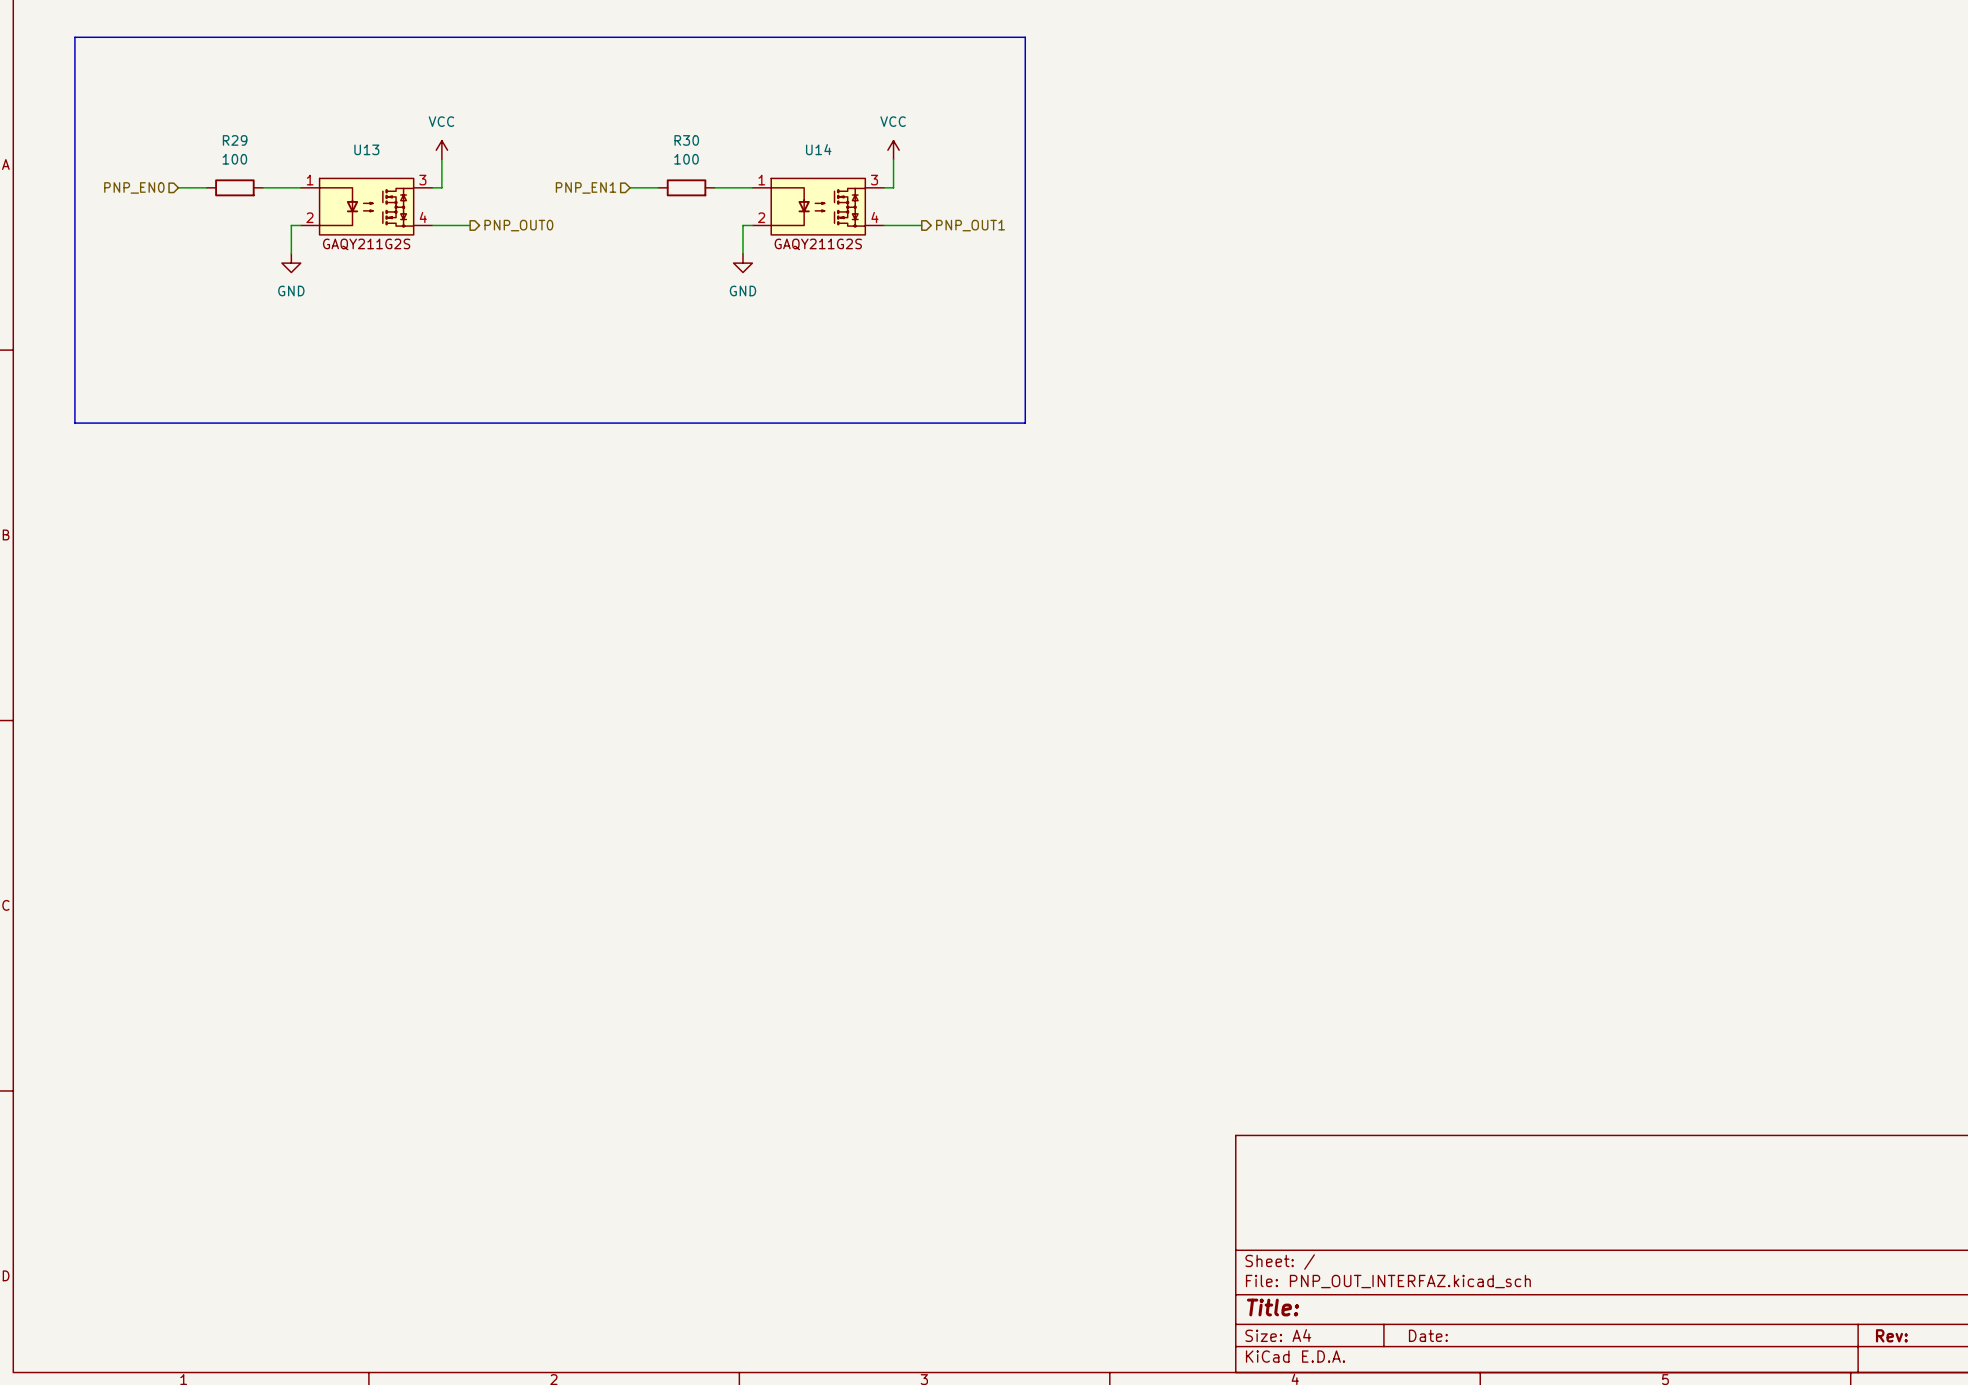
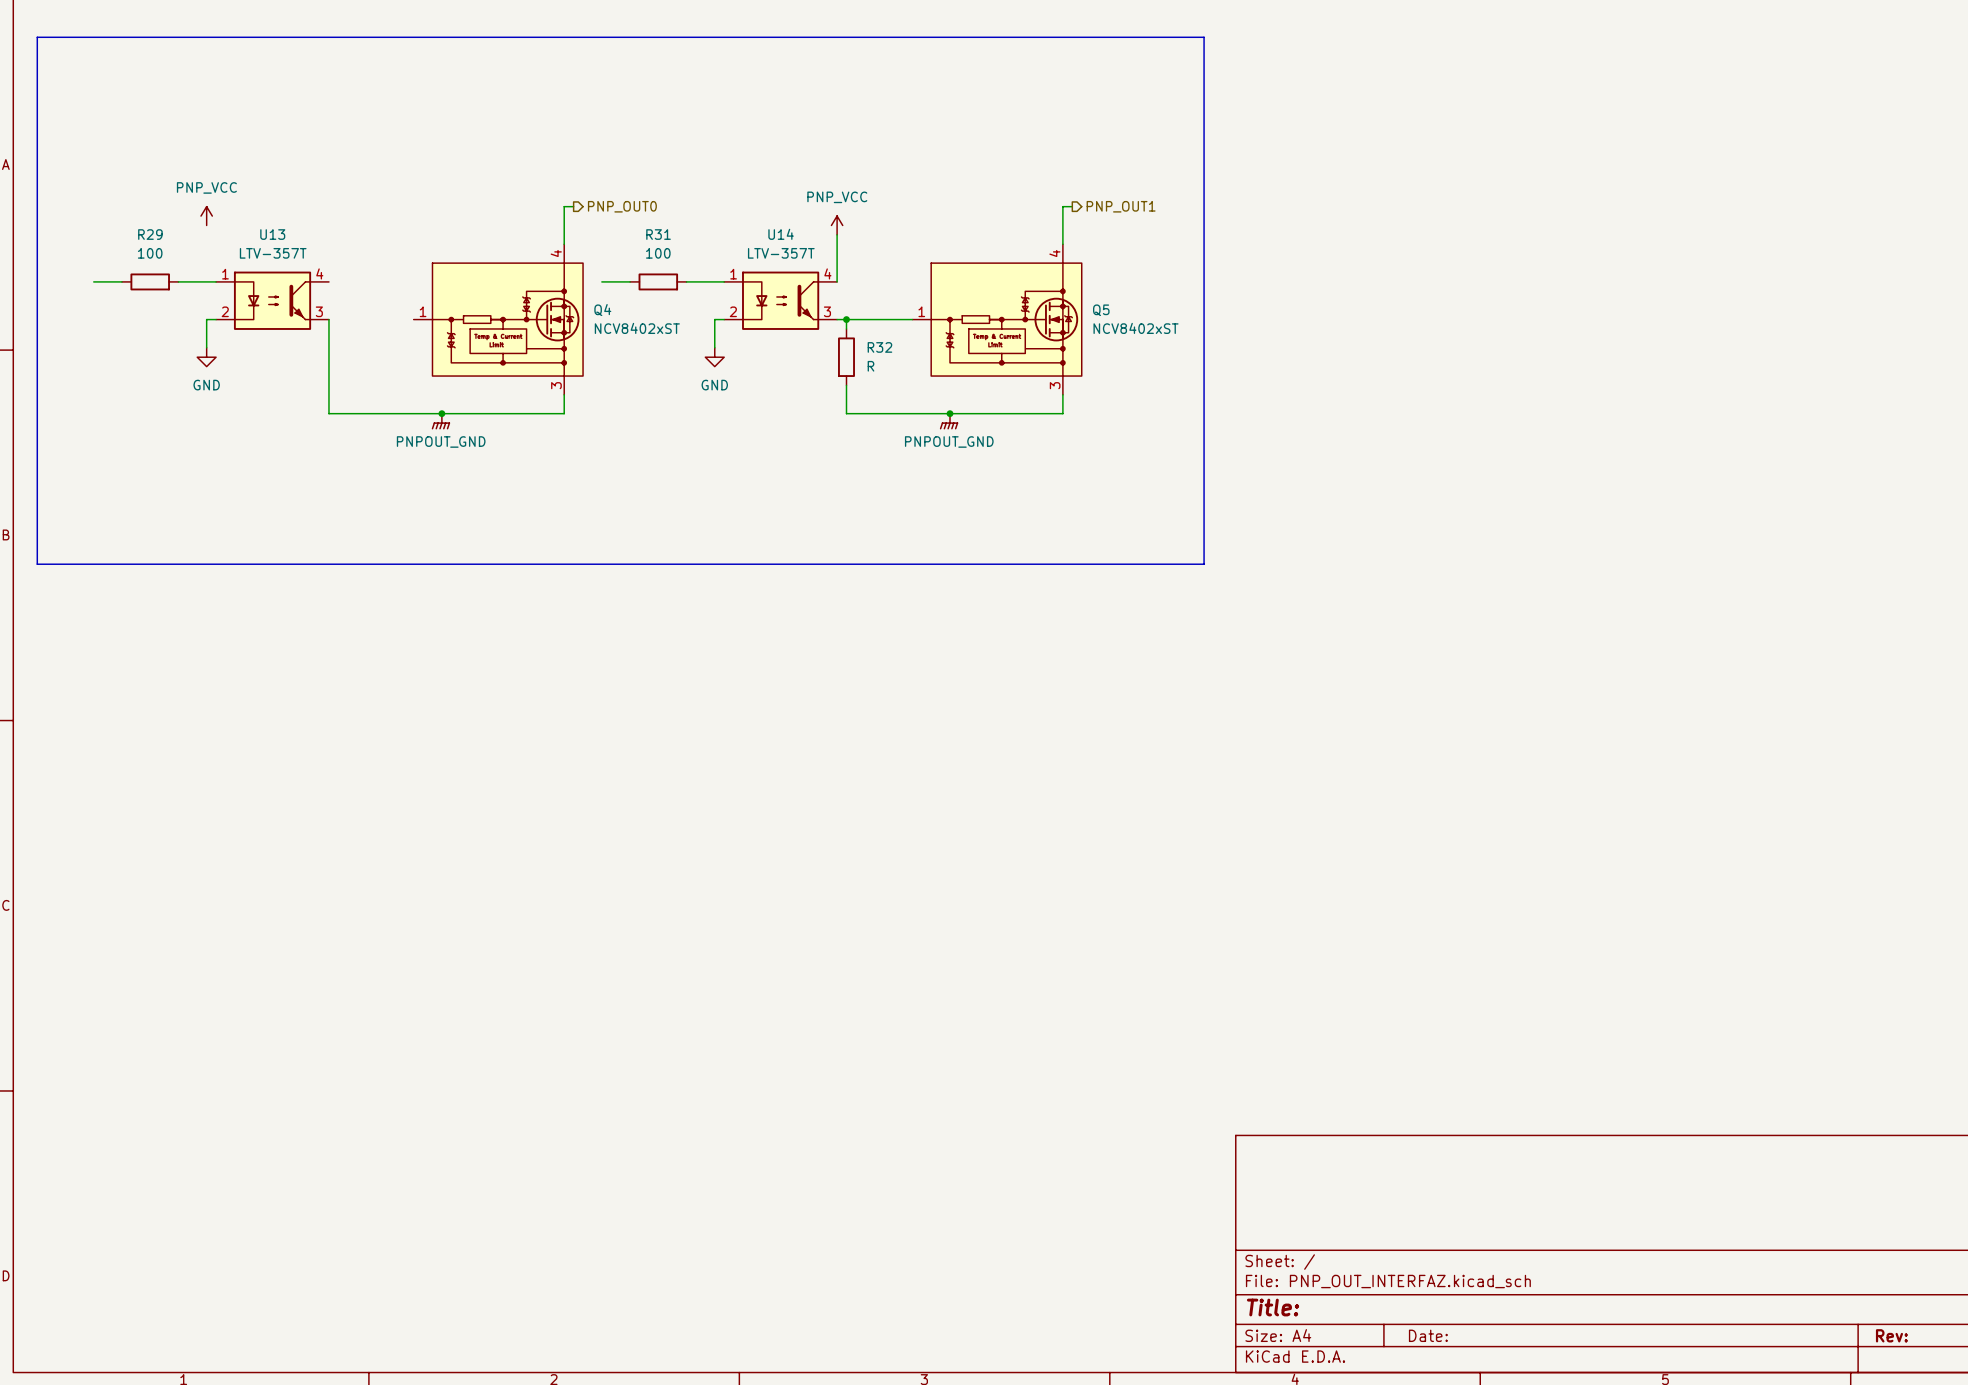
line: (74, 37) (74, 423) (1025, 423) (1025, 37) -> (74, 37) (37, 37) (37, 564) (1204, 564) (1204, 37) (1025, 37)
power symbol: VCC (441, 150) -> none
power symbol: VCC (893, 150) -> none
wire: (441, 159) (441, 187) (432, 187) -> none
wire: (893, 159) (893, 187) (884, 187) -> none
U13 symbol: [300, 178, 433, 235] -> [216, 271, 329, 330]
U14 symbol: [752, 178, 885, 235] -> [724, 271, 838, 330]
hierarchical label: PNP_EN0 (134, 187) -> none
wire: (178, 187) (206, 187) -> (93, 281) (121, 281)
R29 position: (234, 187) -> (150, 281)
wire: (263, 187) (300, 187) -> (178, 281) (216, 281)
hierarchical label: PNP_EN1 (586, 187) -> none
wire: (630, 187) (658, 187) -> (601, 281) (630, 281)
R30: 100 (686, 187) -> none
wire: (714, 187) (752, 187) -> (686, 281) (724, 281)
wire: none -> (573, 206) (564, 206) (564, 244)
wire: none -> (1072, 206) (1062, 206) (1062, 244)
power symbol: none -> PNP_VCC (206, 216)
wire: (300, 225) (291, 225) (291, 253) -> (216, 319) (206, 319) (206, 347)
wire: (432, 225) (470, 225) -> none
hierarchical label position: PNP_OUT0 (518, 225) -> PNP_OUT0 (622, 206)
wire: (752, 225) (742, 225) (742, 253) -> (724, 319) (714, 319) (714, 347)
power symbol: none -> PNP_VCC (837, 225)
wire: (884, 225) (921, 225) -> none
hierarchical label position: PNP_OUT1 (970, 225) -> PNP_OUT1 (1121, 206)
wire: none -> (837, 234) (837, 281)
U13 value: none -> LTV-357T (273, 253)
U14 value: none -> LTV-357T (781, 253)
power symbol position: GND (291, 263) -> GND (206, 357)
power symbol position: GND (742, 263) -> GND (714, 357)
R31: none -> 100 (658, 281)
wire: none -> (328, 319) (328, 413) (564, 413) (564, 394)
Q4: none -> NCV8402xST (498, 319)
wire: none -> (837, 319) (912, 319)
wire: none -> (846, 319) (846, 328)
junction: none -> (846, 319)
Q5: none -> NCV8402xST (997, 319)
R32: none -> R (846, 357)
wire: none -> (846, 385) (846, 413) (1062, 413) (1062, 394)
junction: none -> (441, 413)
junction: none -> (950, 413)
power symbol: none -> PNPOUT_GND (440, 421)
power symbol: none -> PNPOUT_GND (949, 421)

